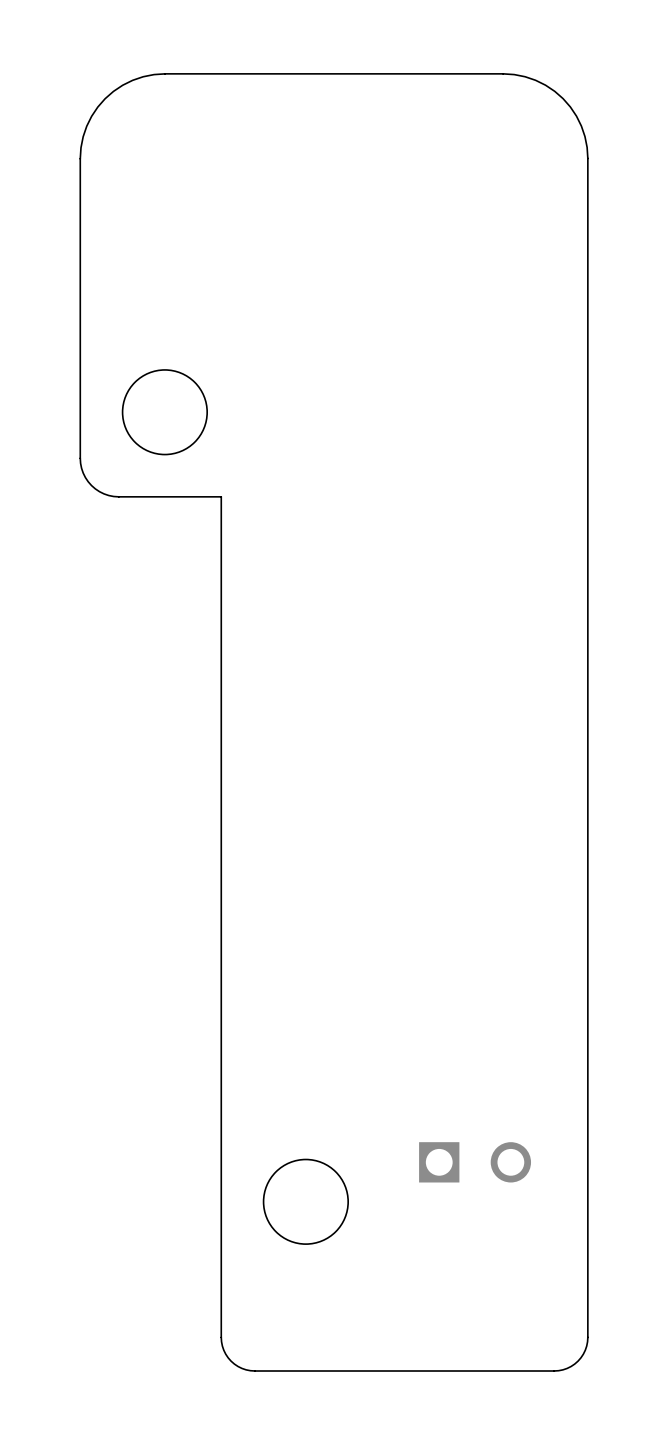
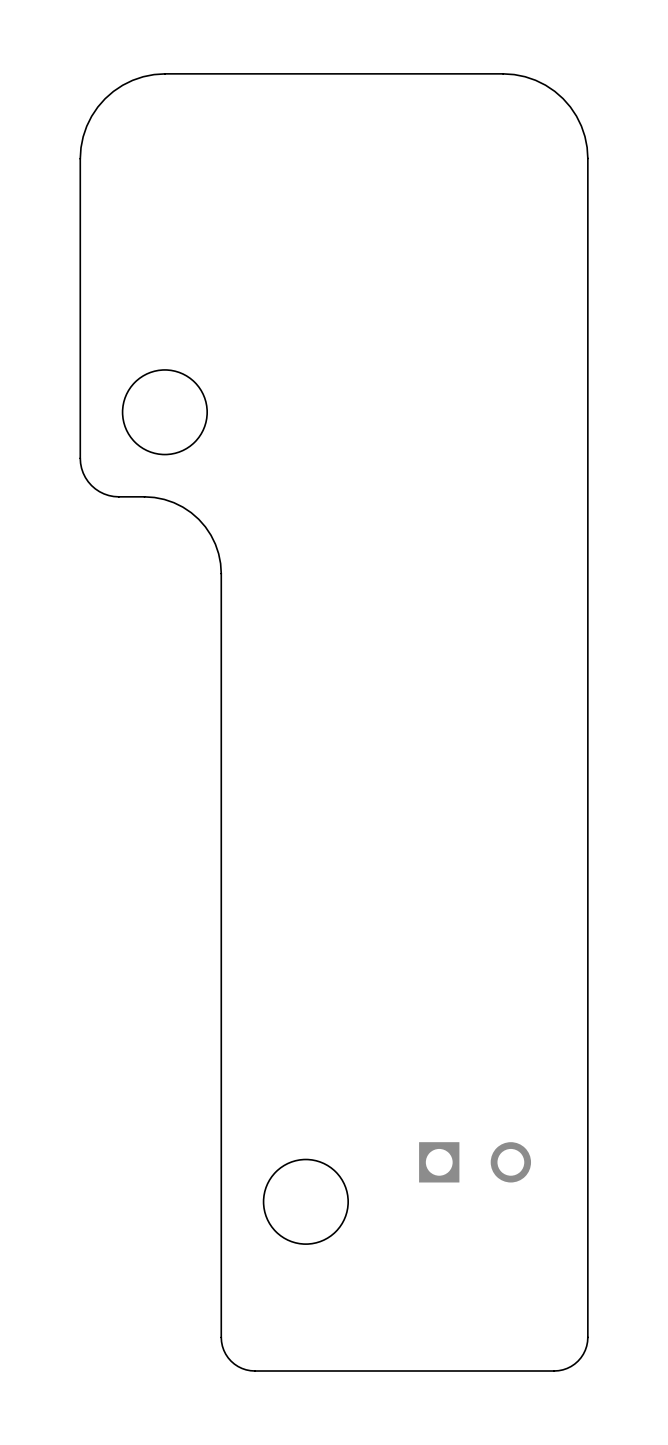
board edge: (144, 496) (221, 496) (221, 573) -> (144, 496) (173, 502) (198, 519) (215, 544) (221, 573)

